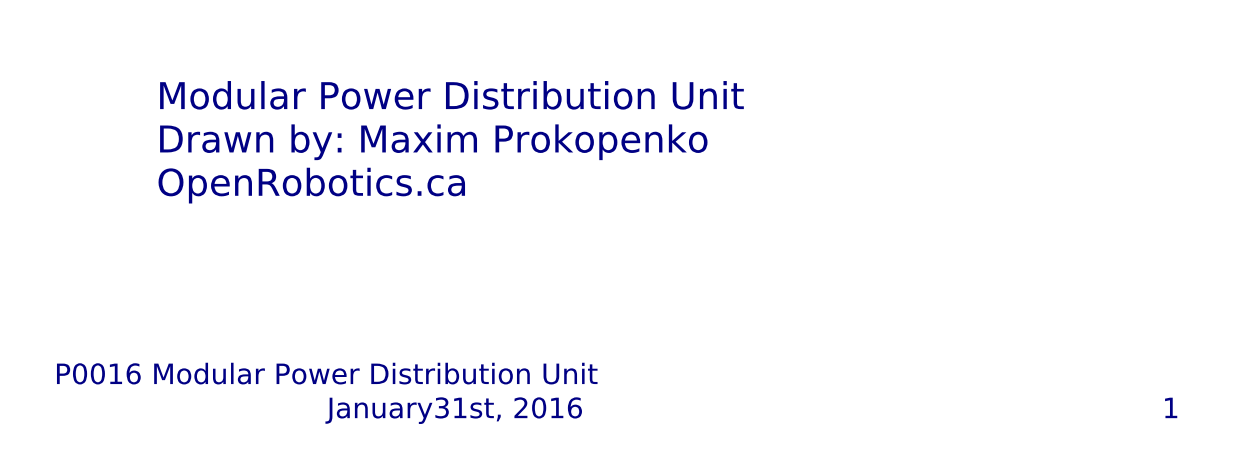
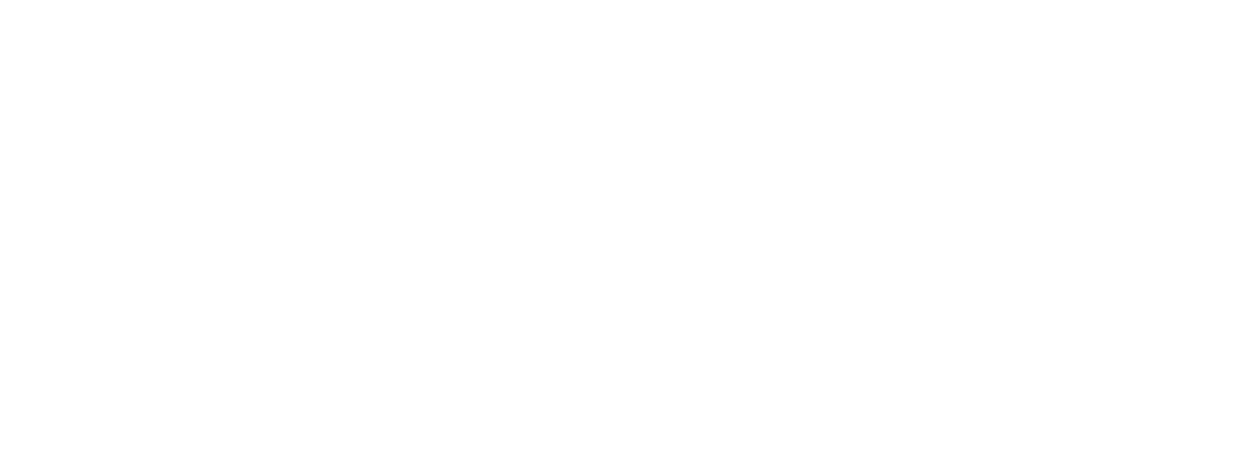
text: Modular Power Distribution Unit (451, 95) -> none
text: Drawn by: Maxim Prokopenko (433, 142) -> none
text: OpenRobotics.ca (311, 185) -> none
text: P0016 Modular Power Distribution Unit (327, 373) -> none
text: 1 (1171, 407) -> none
text: January31st, 2016 (453, 410) -> none

